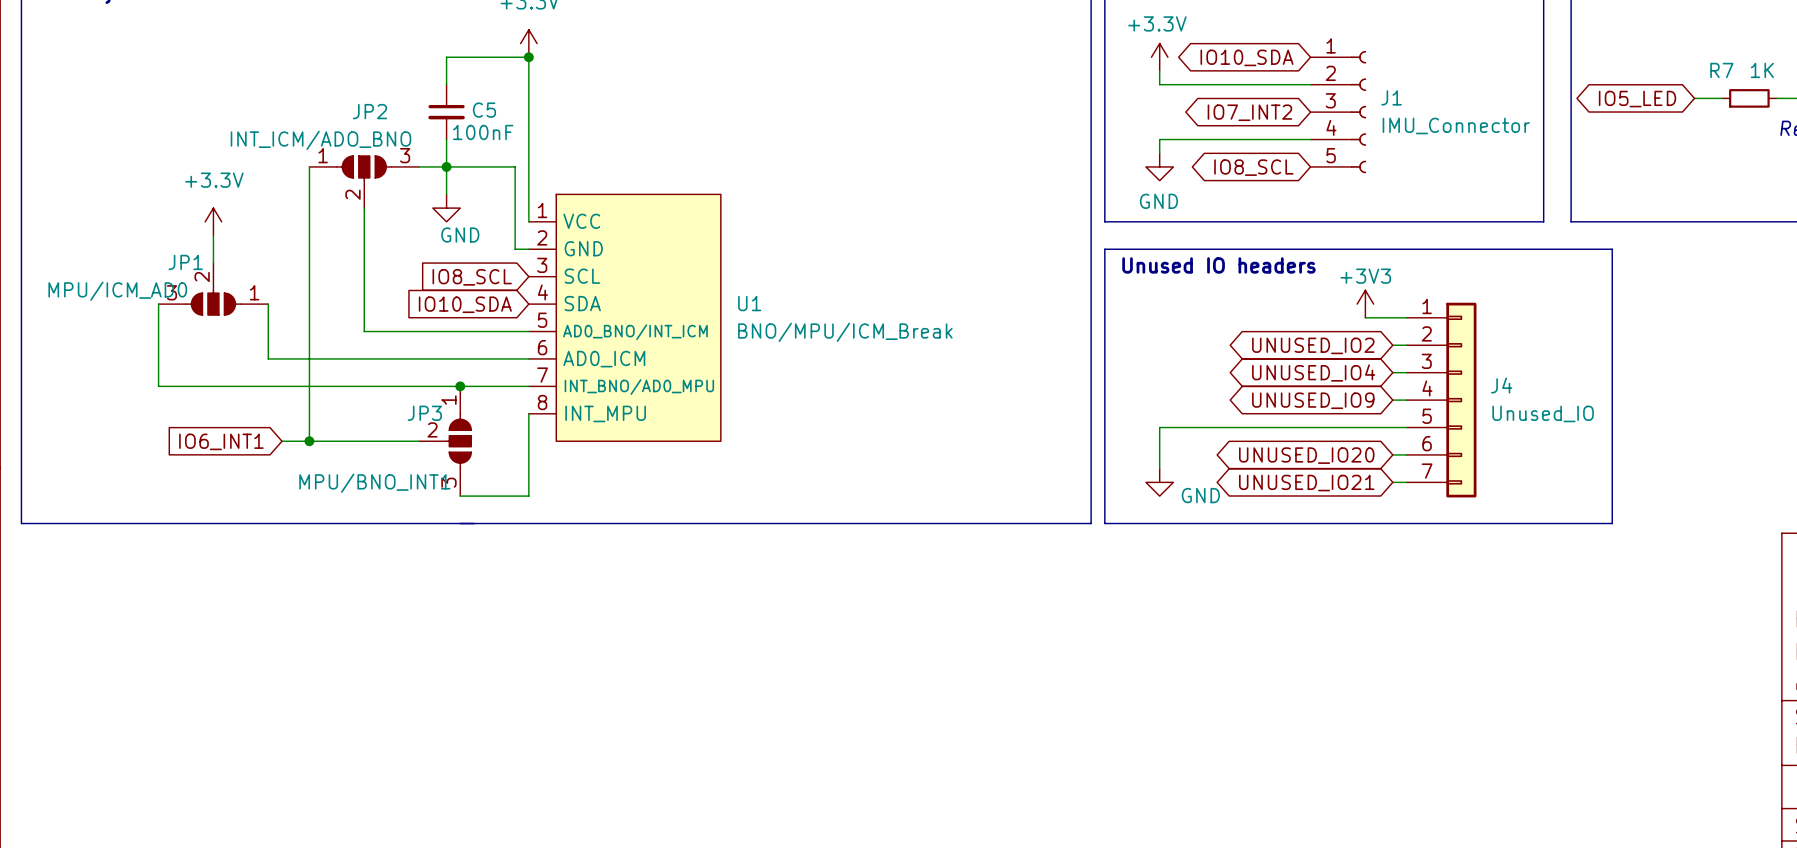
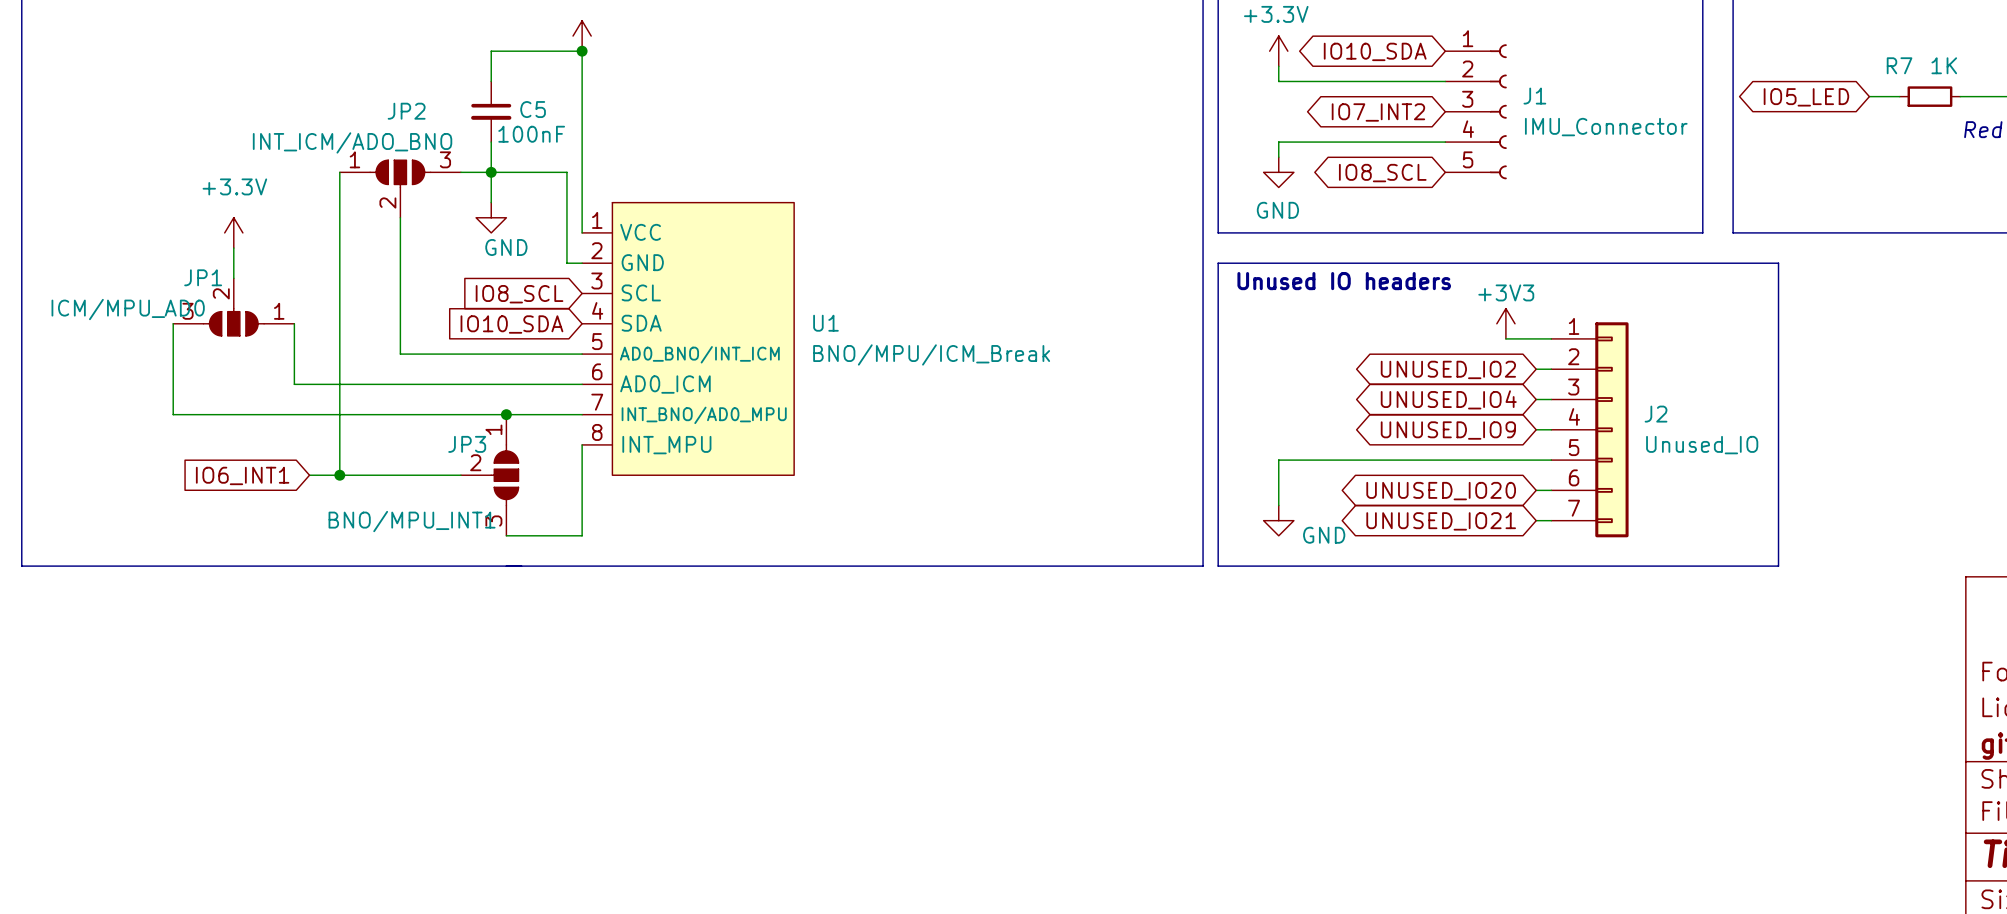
JP1 value: MPU/ICM_AD0 (117, 291) -> ICM/MPU_AD0 (128, 309)
J4 name: J4 (1501, 385) -> J2 (1656, 414)
JP3 value: MPU/BNO_INT1 (374, 483) -> BNO/MPU_INT1 (412, 521)

